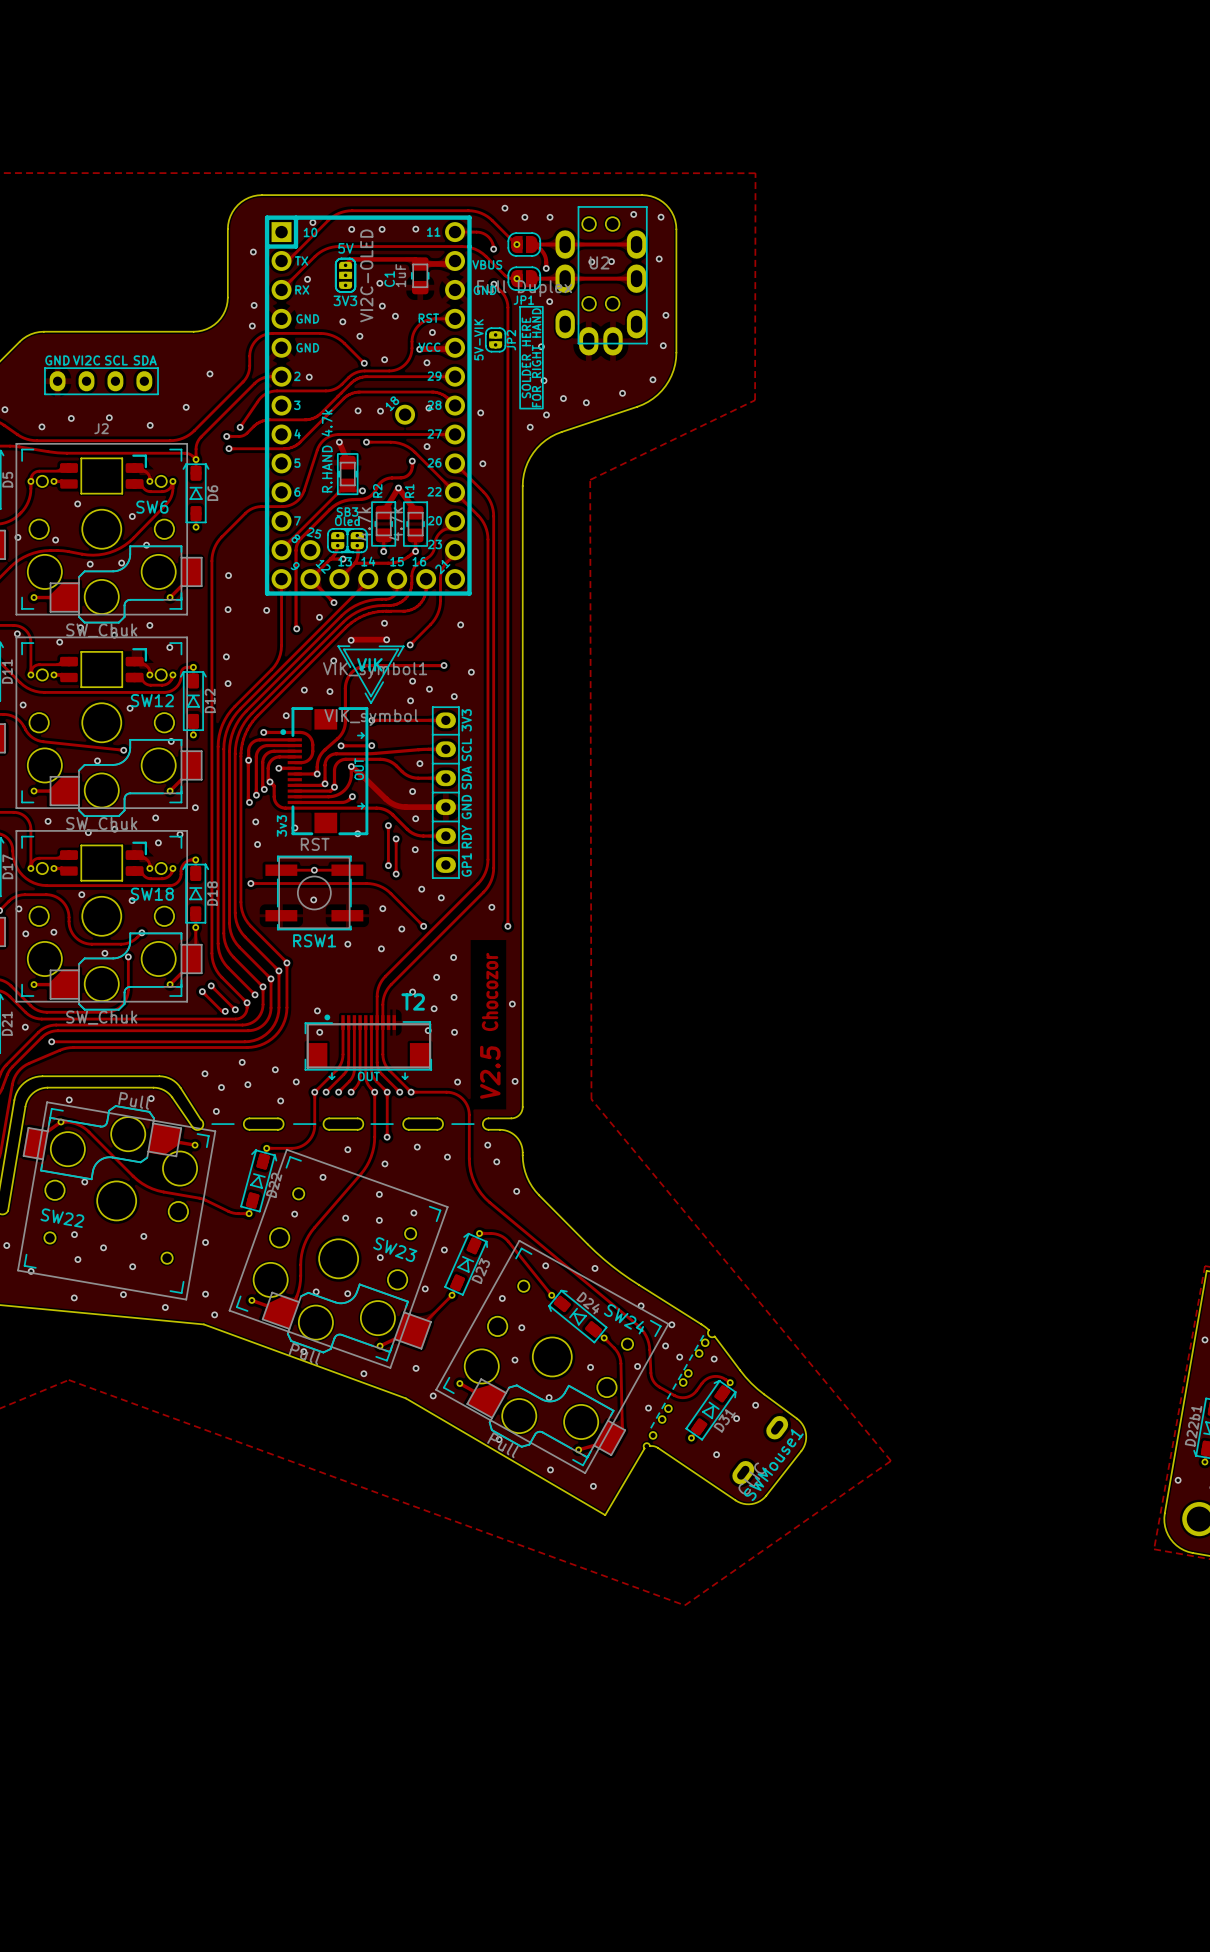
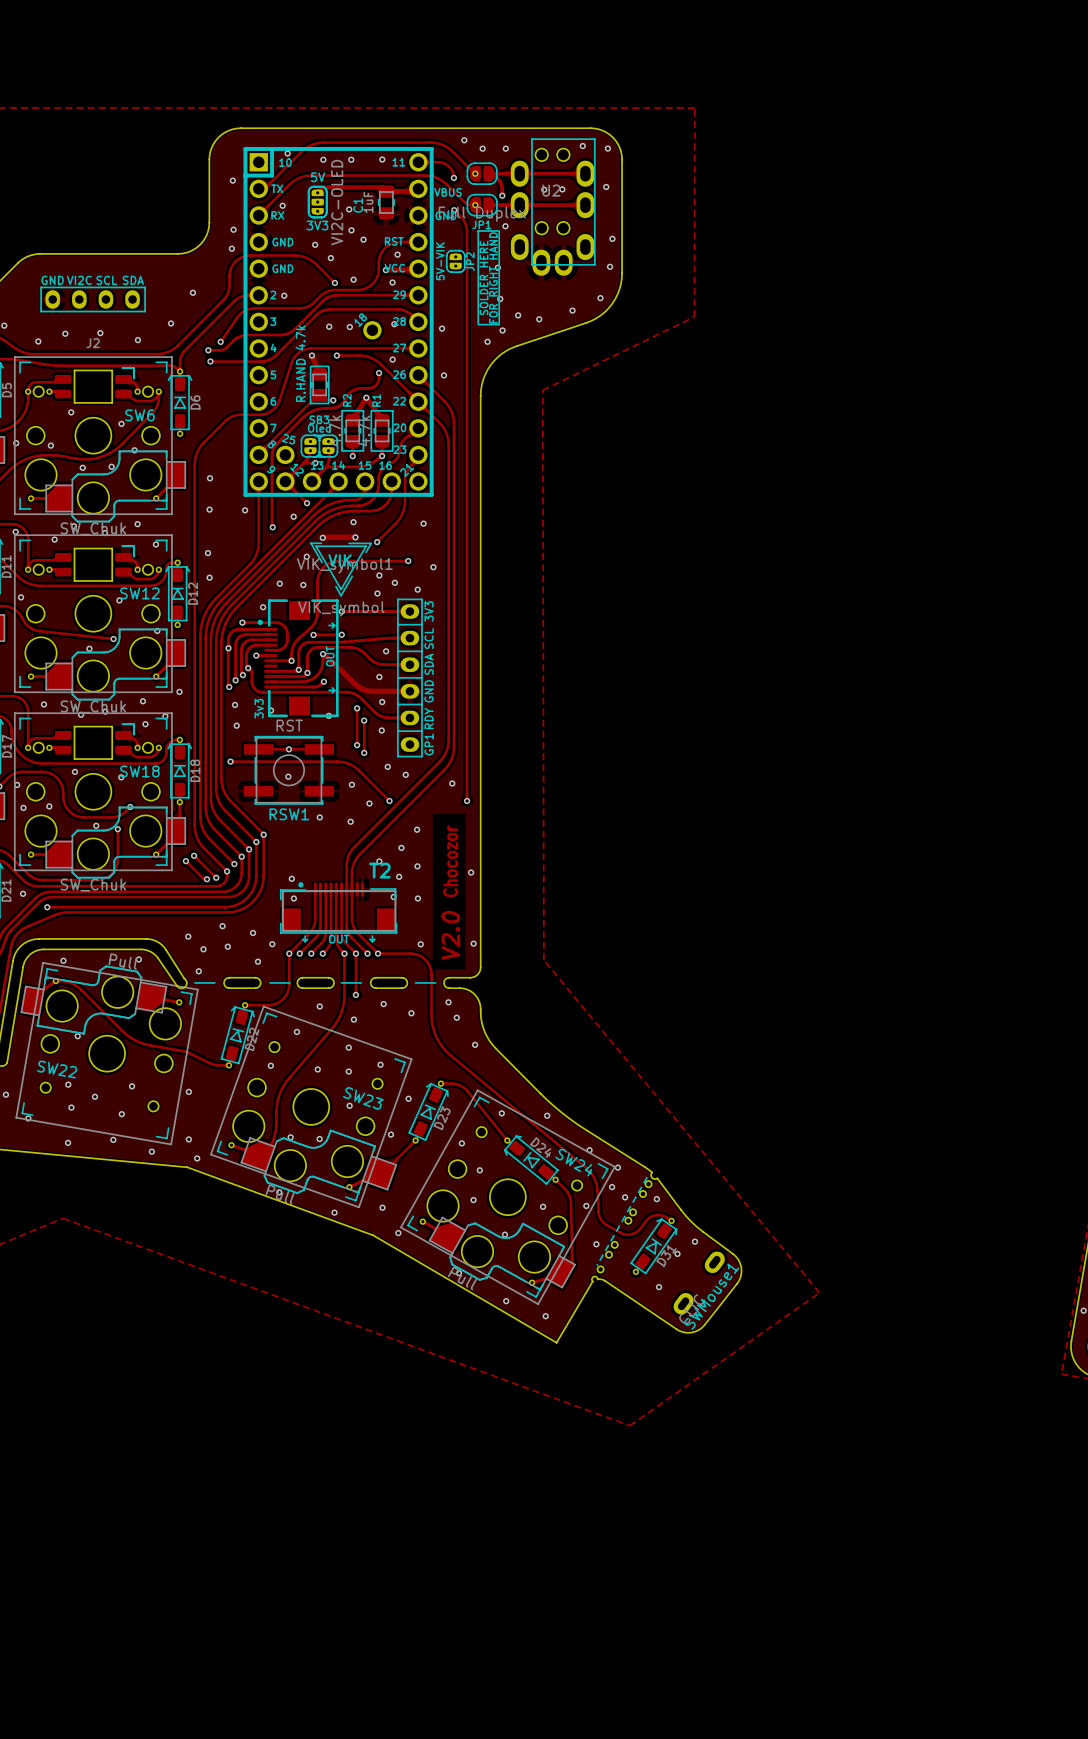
text: V2.5 (490, 1072) -> V2.0 (450, 935)

